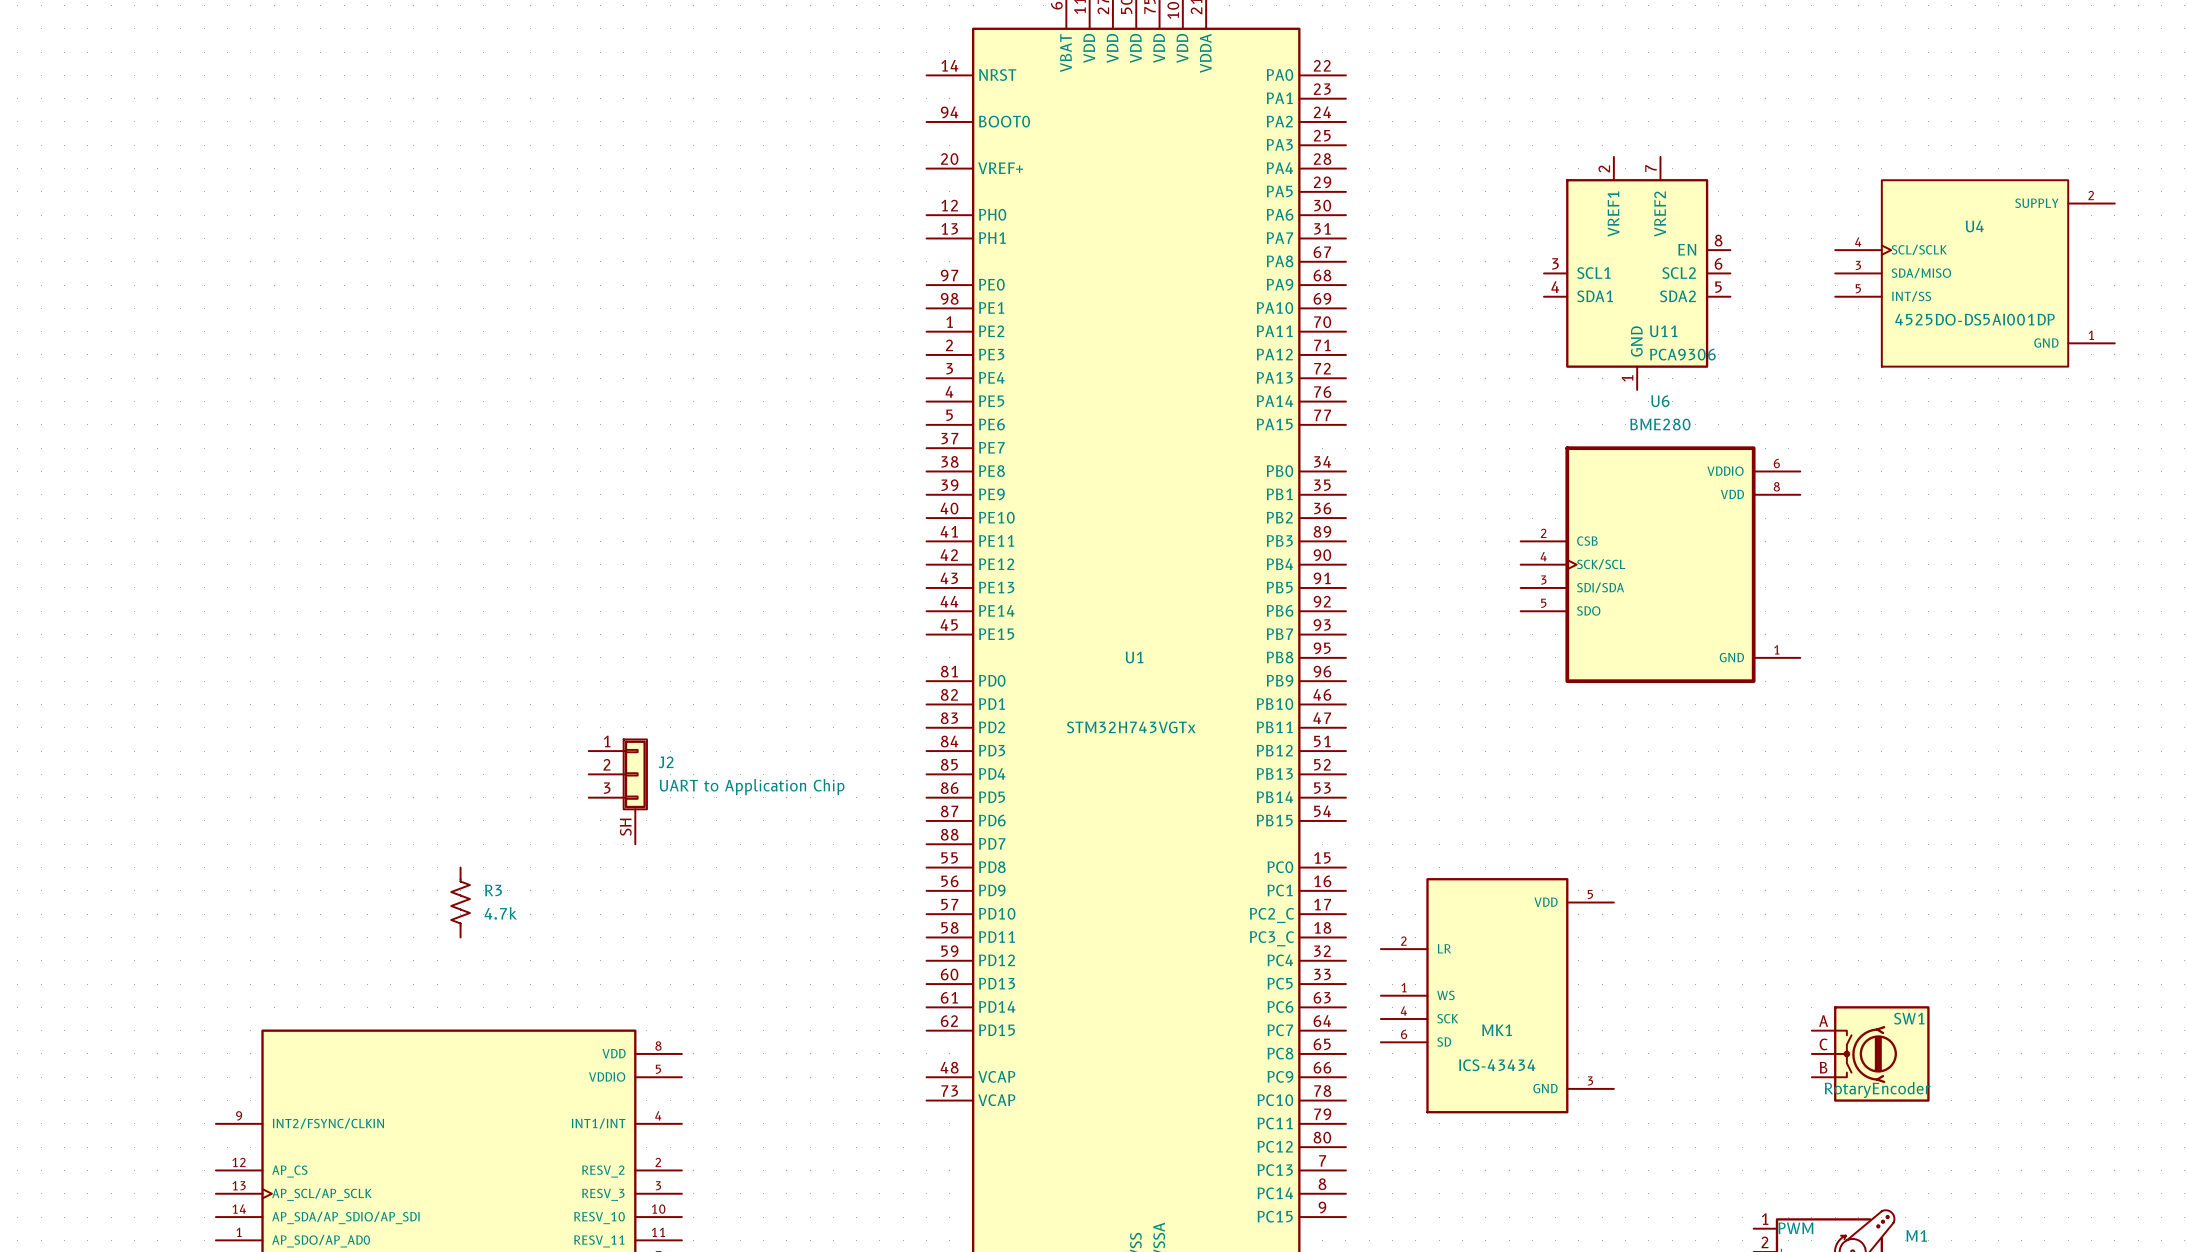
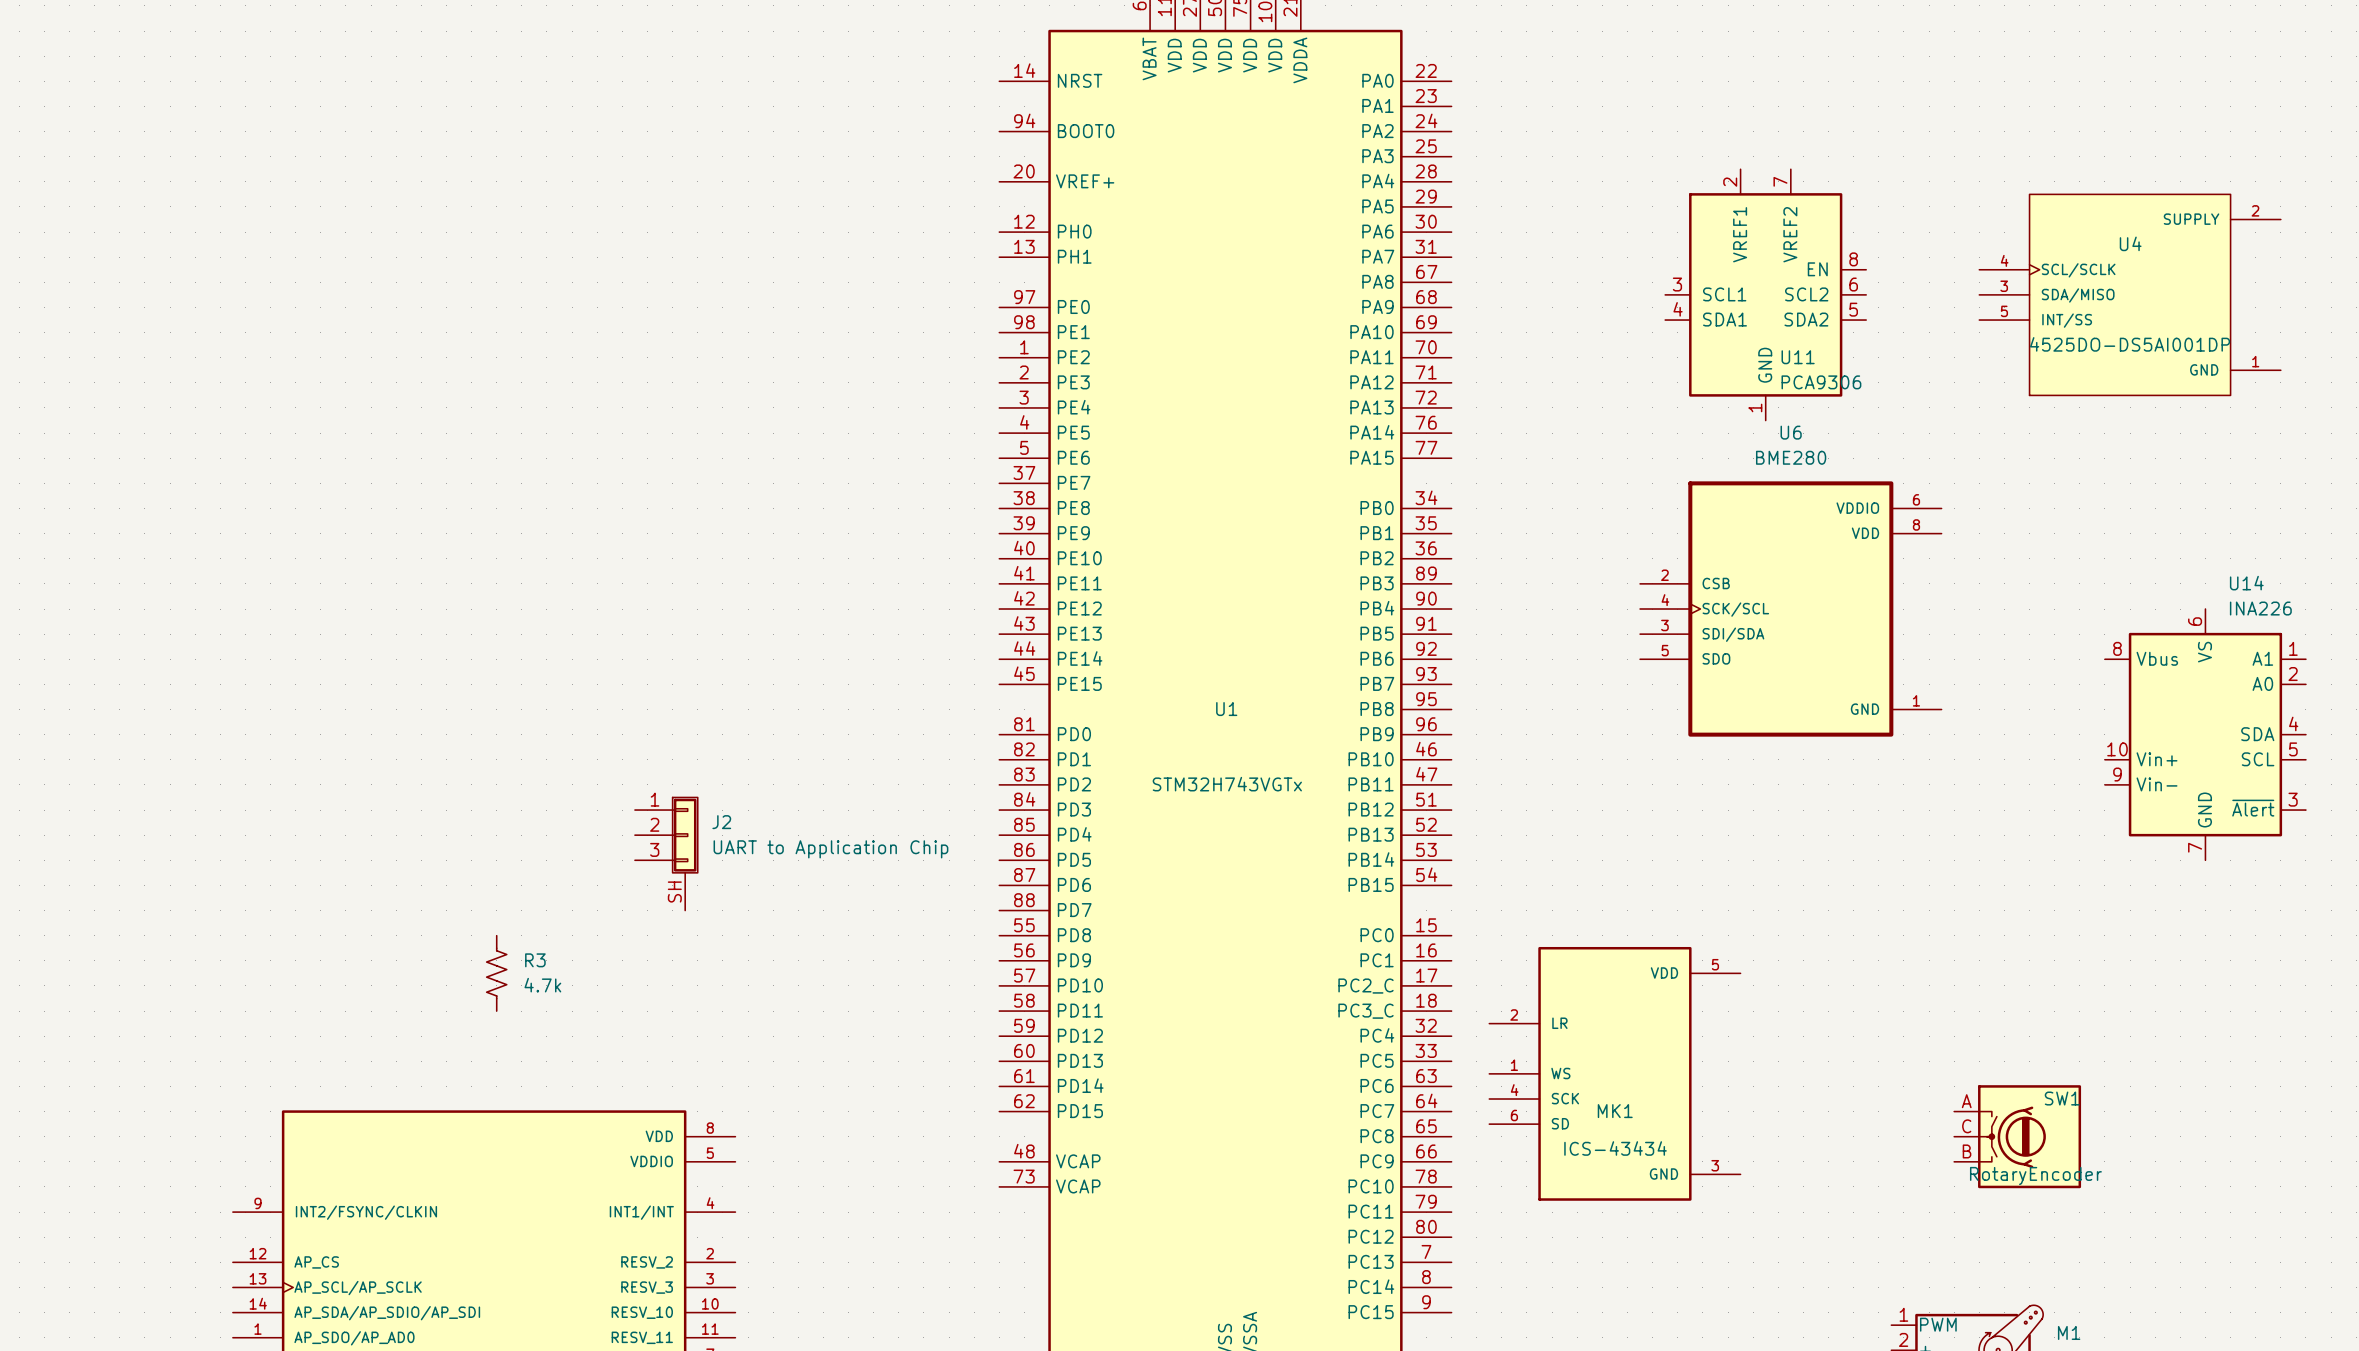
U14: none -> INA226 (2205, 734)

